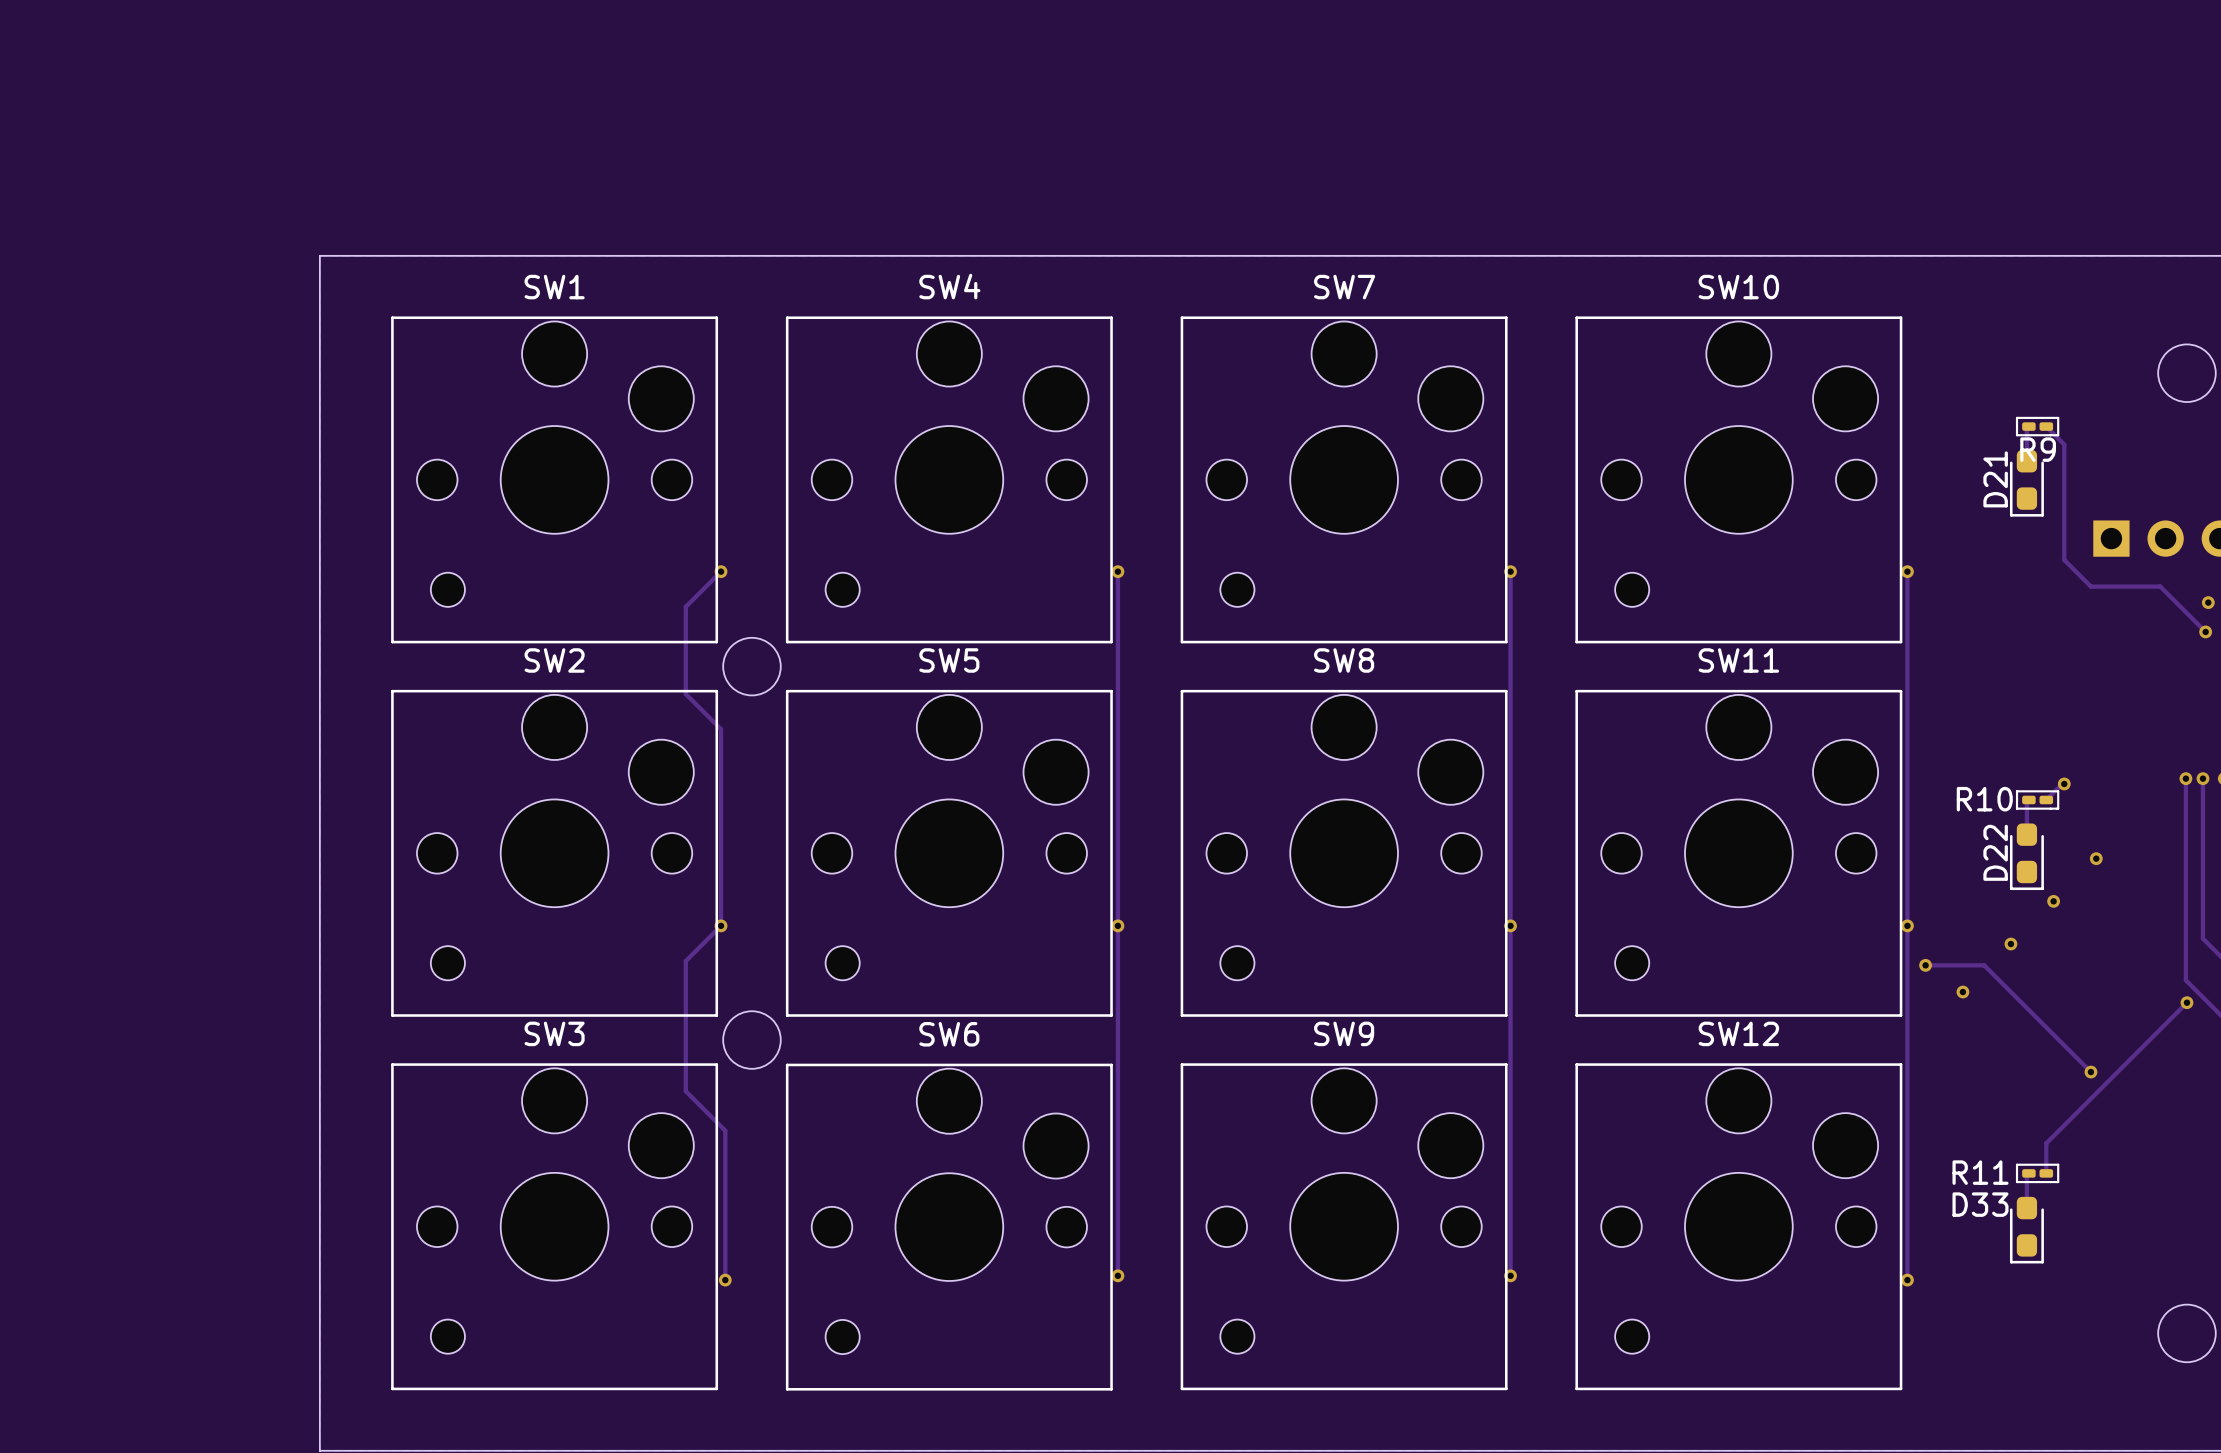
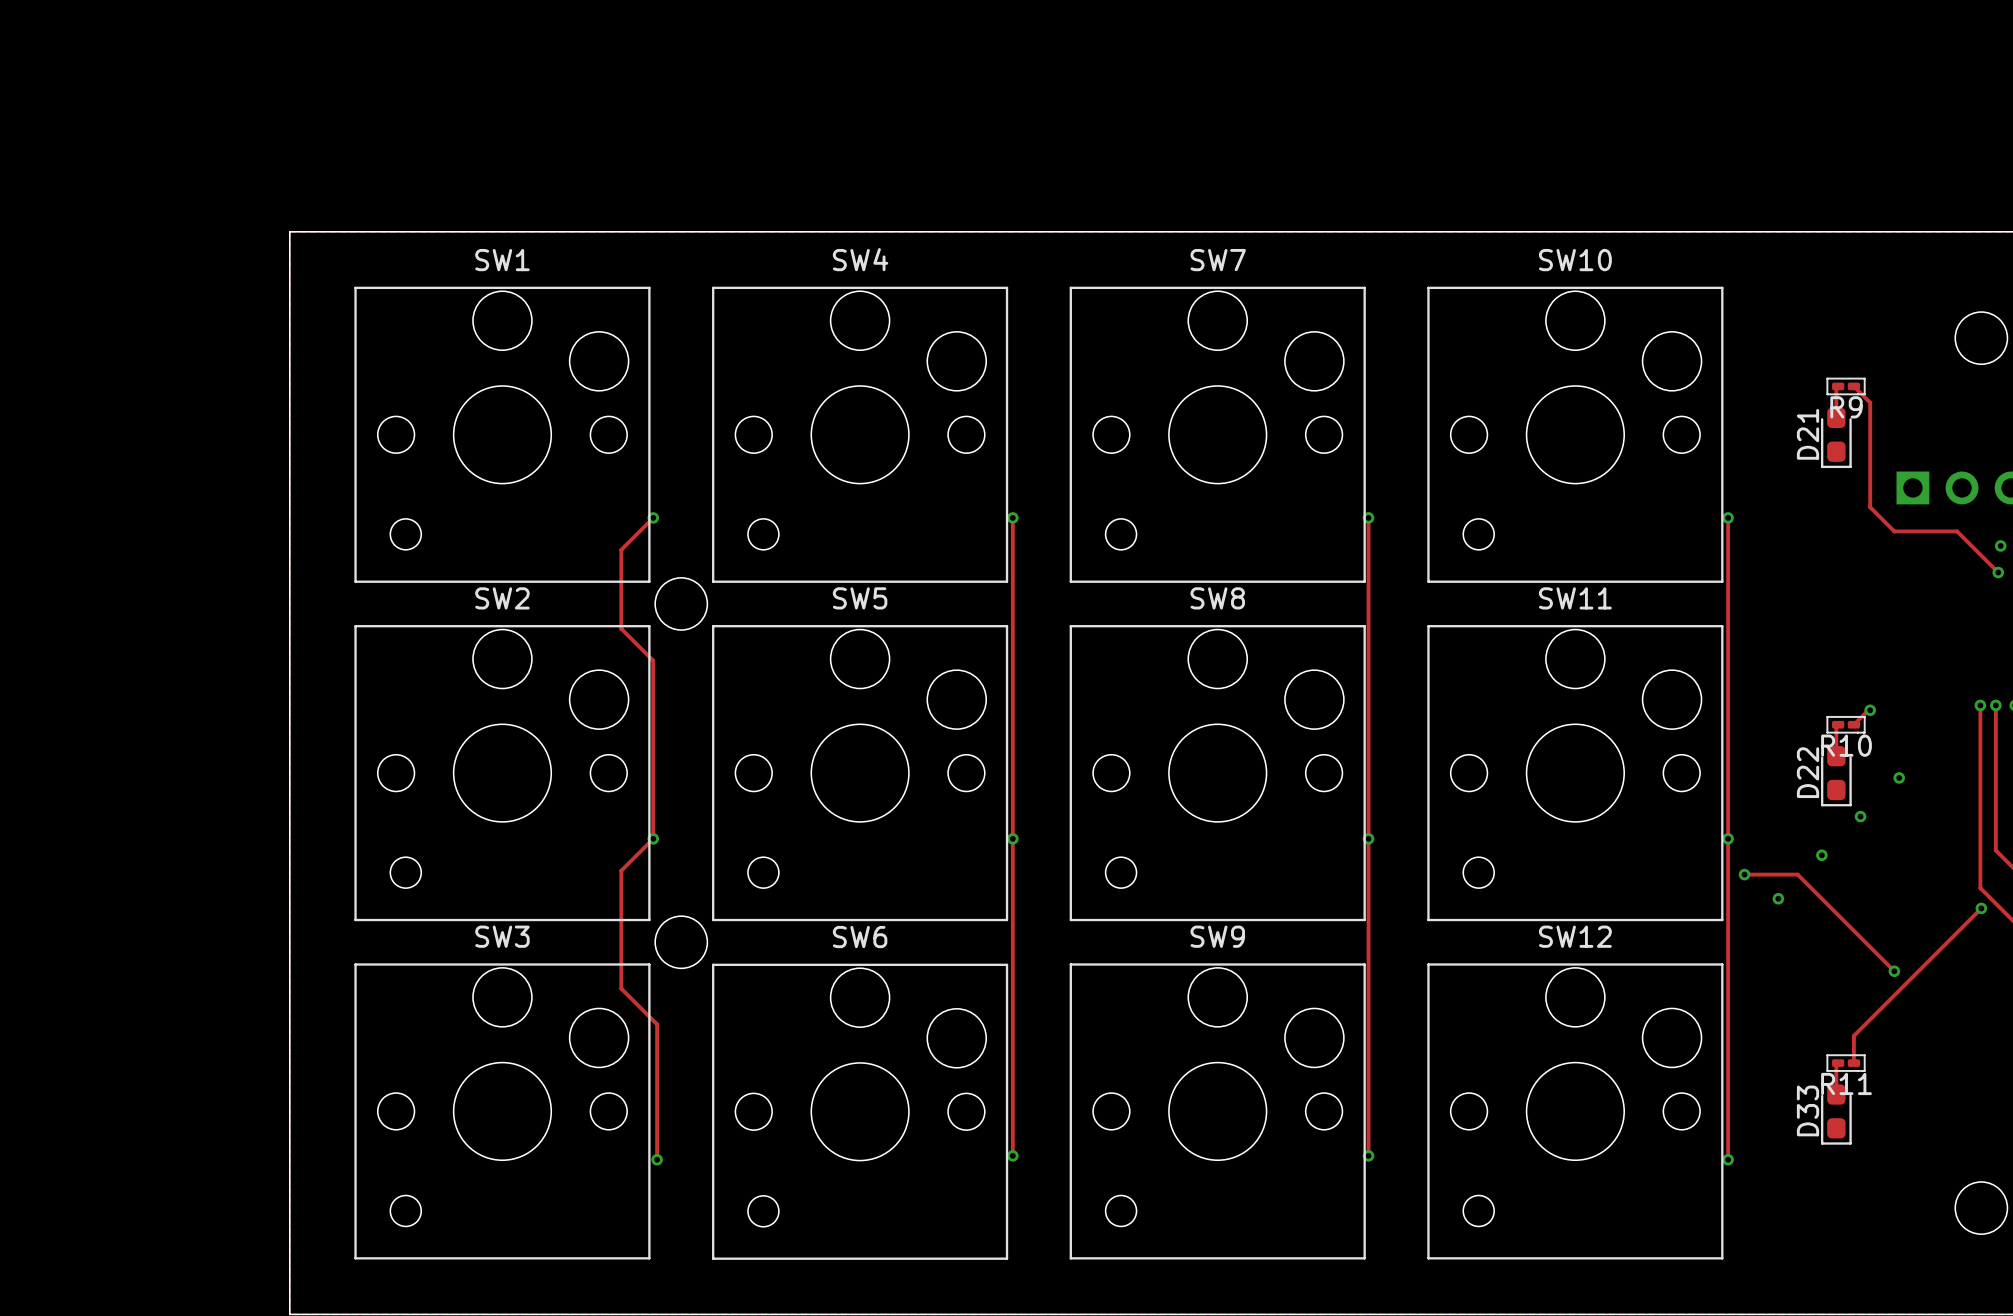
R10 name position: R10 (1984, 799) -> R10 (1846, 745)
R11 name position: R11 (1980, 1172) -> R11 (1846, 1083)
D33 name rotation: 0° (1980, 1204) -> 90° counterclockwise (1808, 1110)

